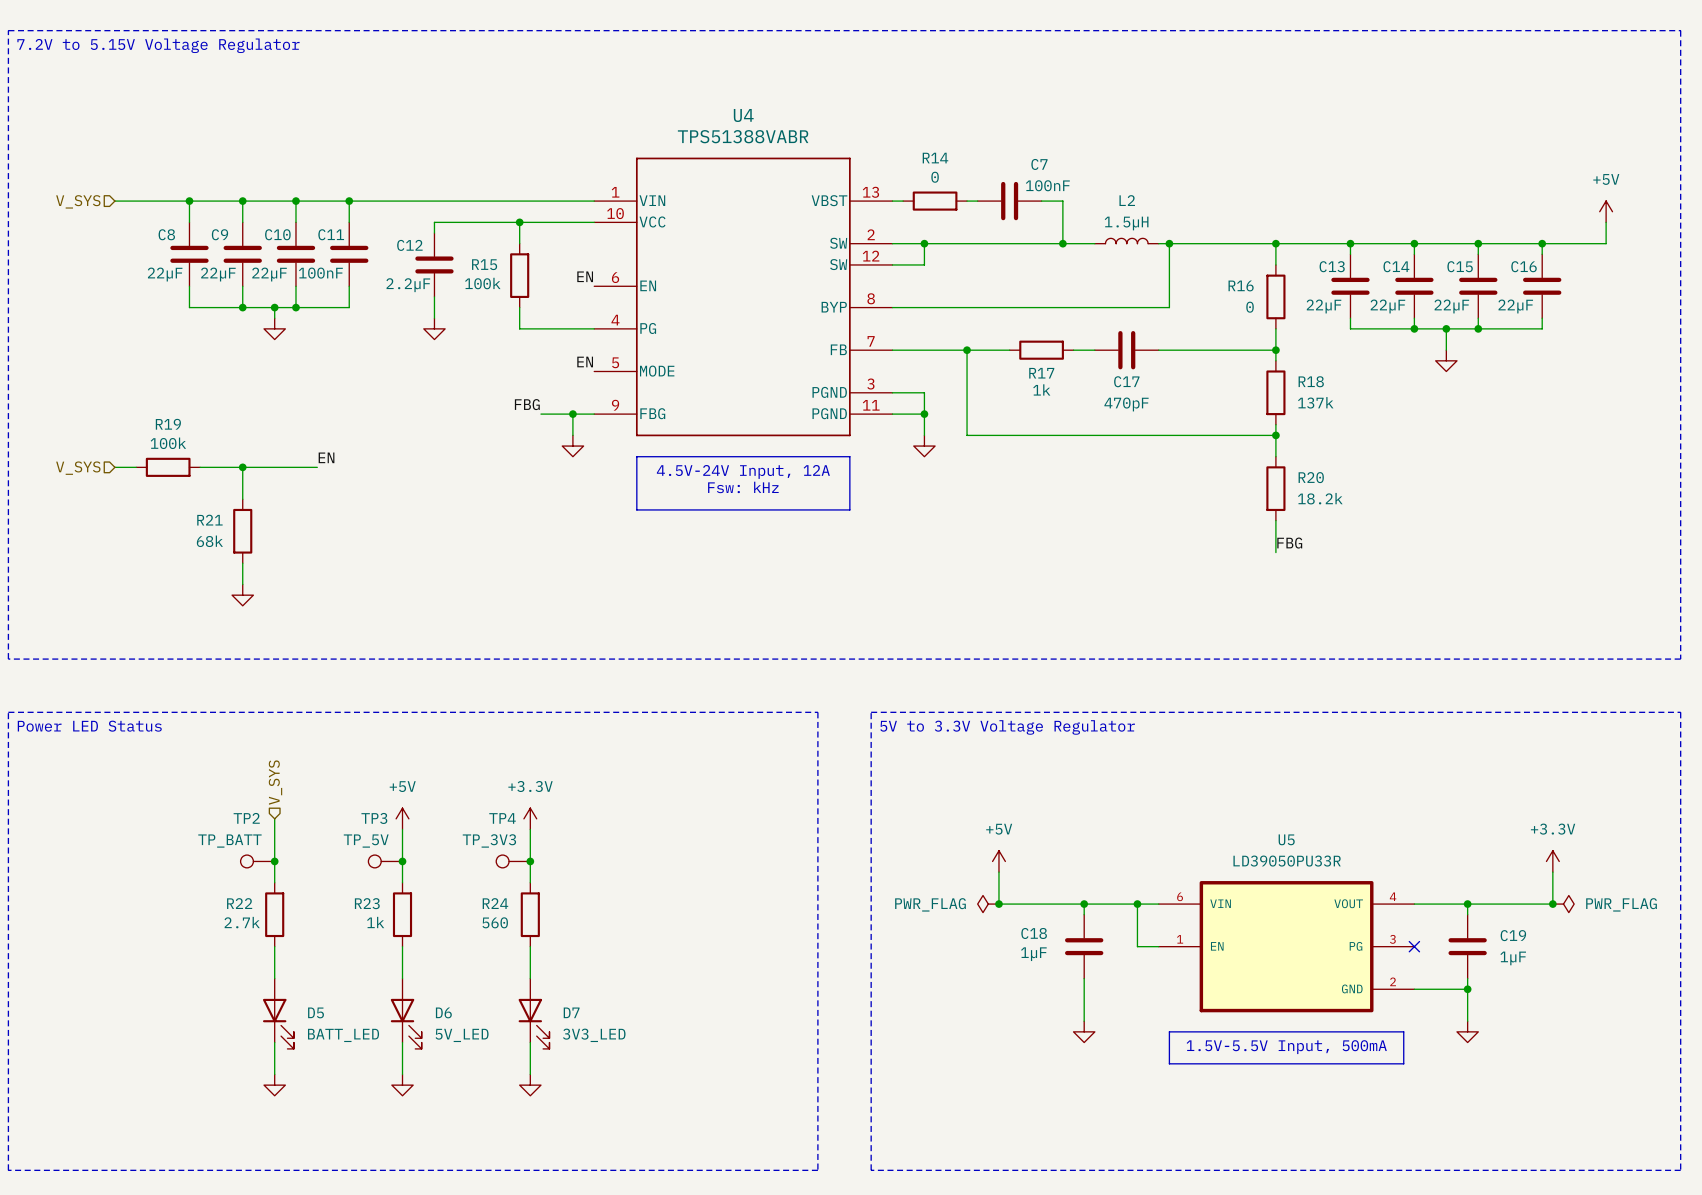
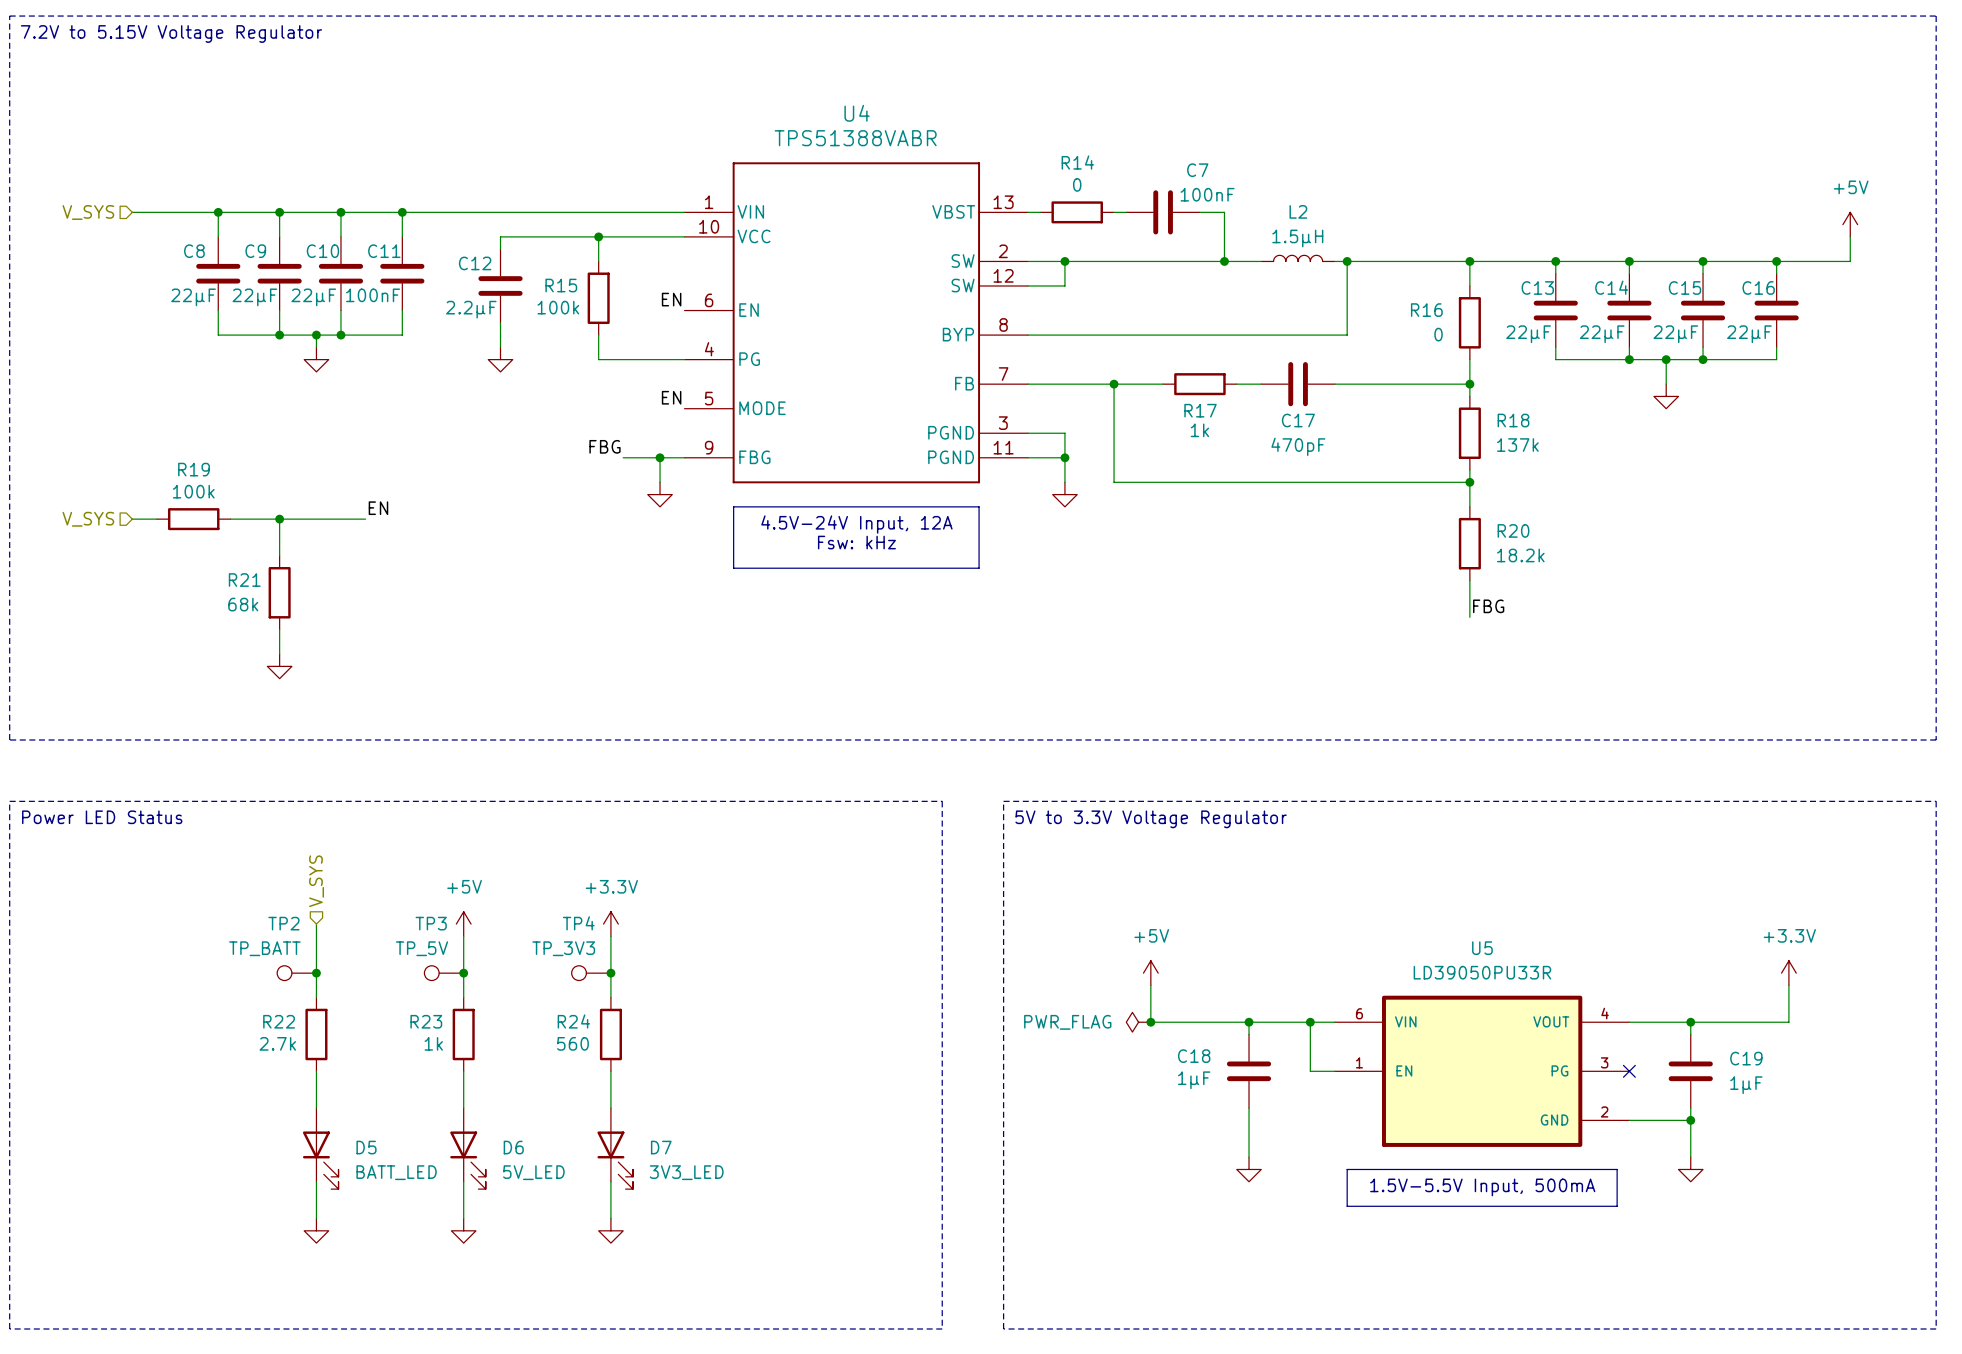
junction: (1552, 904) -> none
power symbol: PWR_FLAG (1563, 904) -> none

